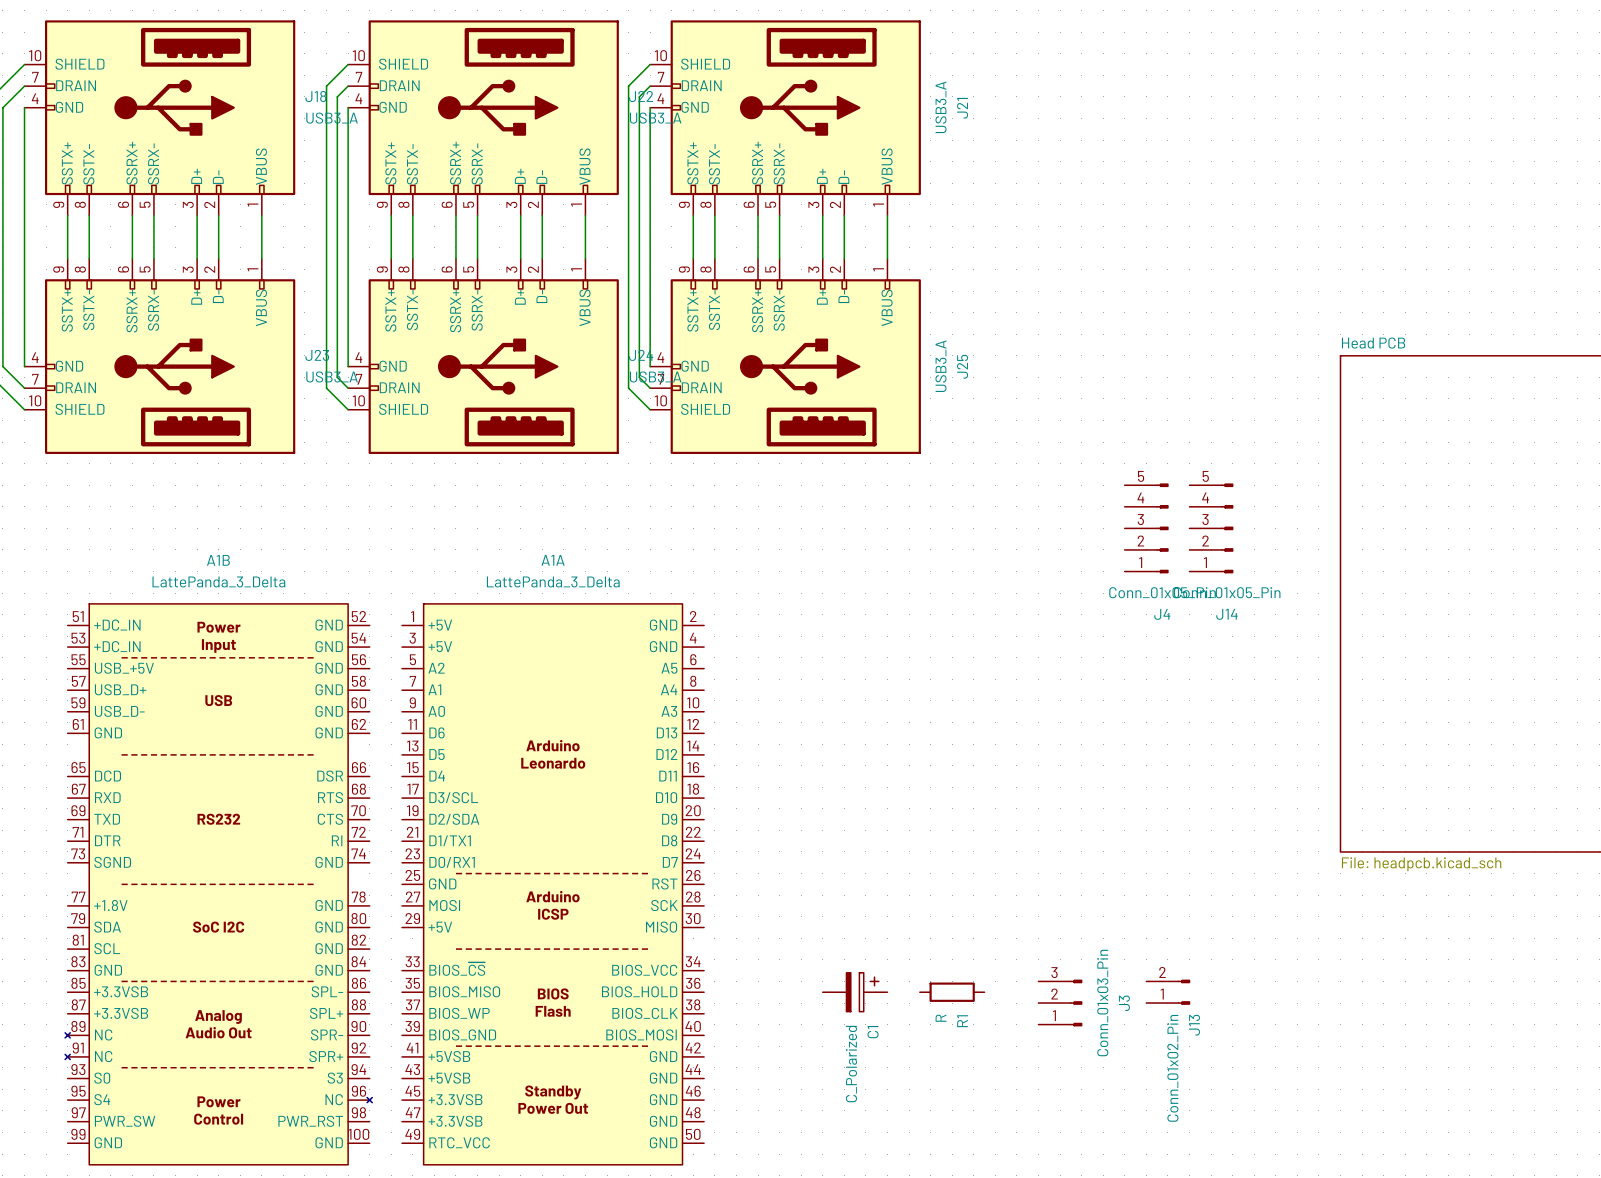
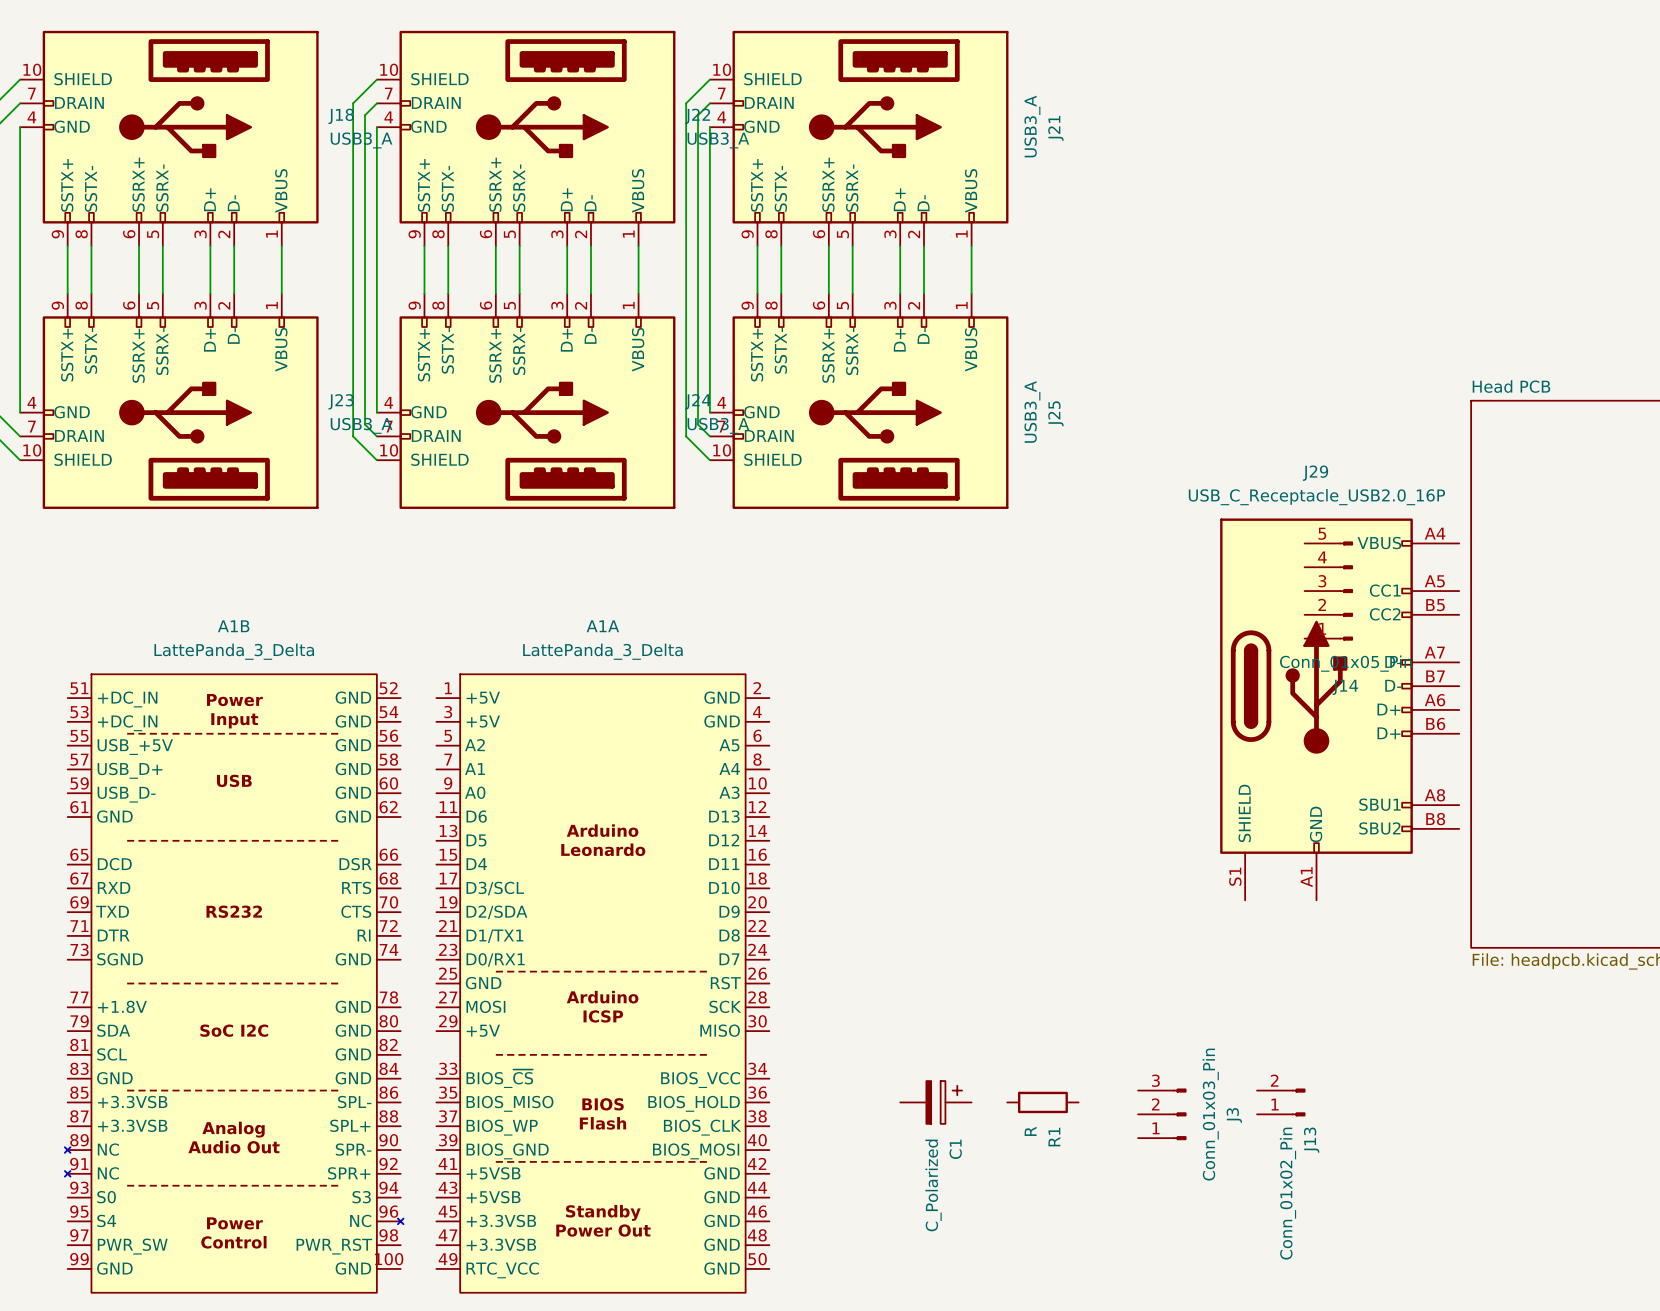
J4: Conn_01x05_Pin (1146, 528) -> none
J29: none -> USB_C_Receptacle_USB2.0_16P (1339, 709)

